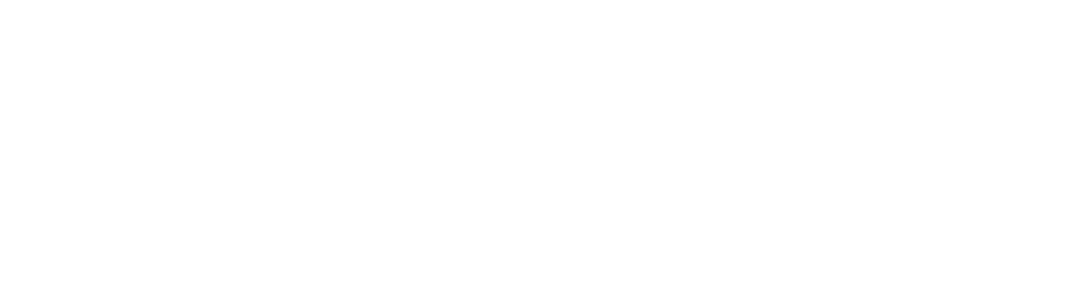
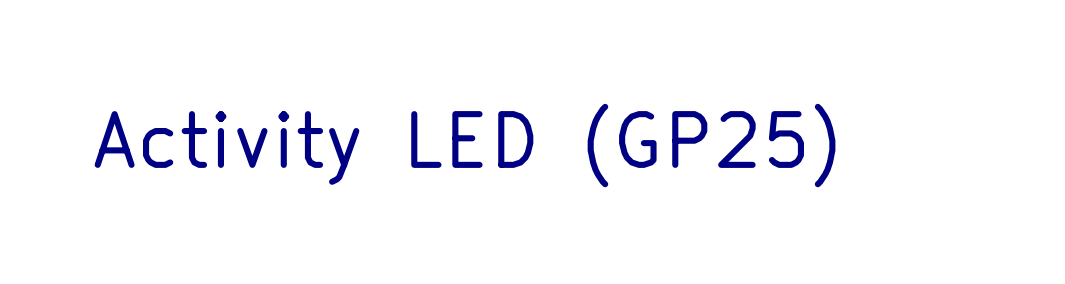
text: none -> Activity LED (GP25) (465, 145)

